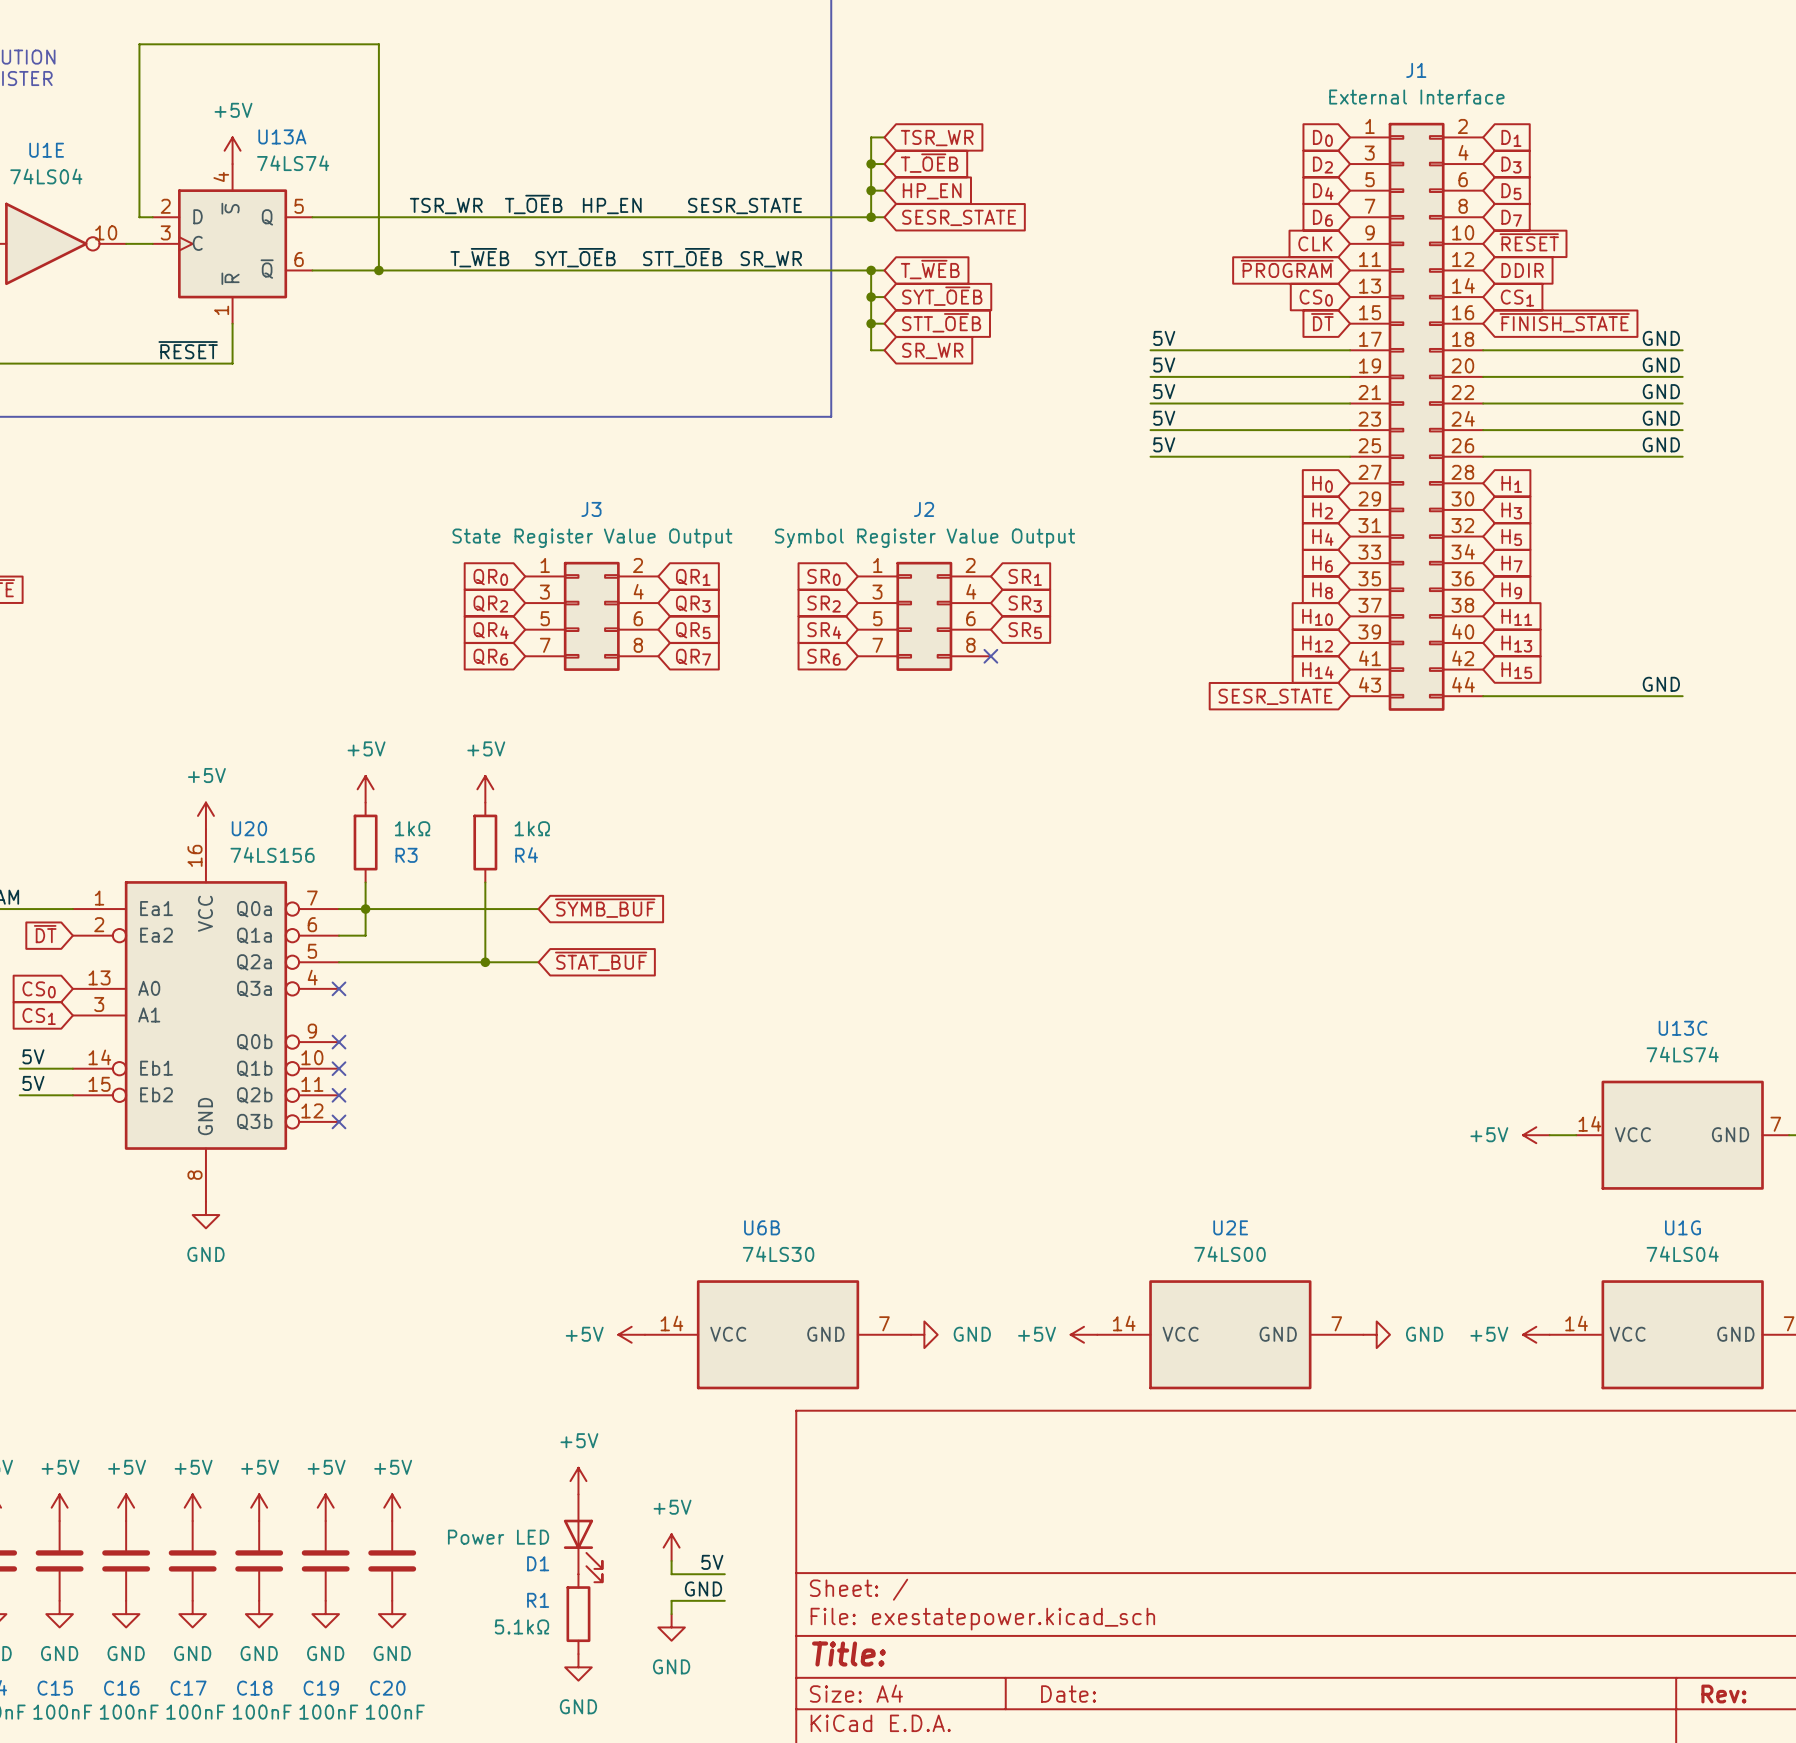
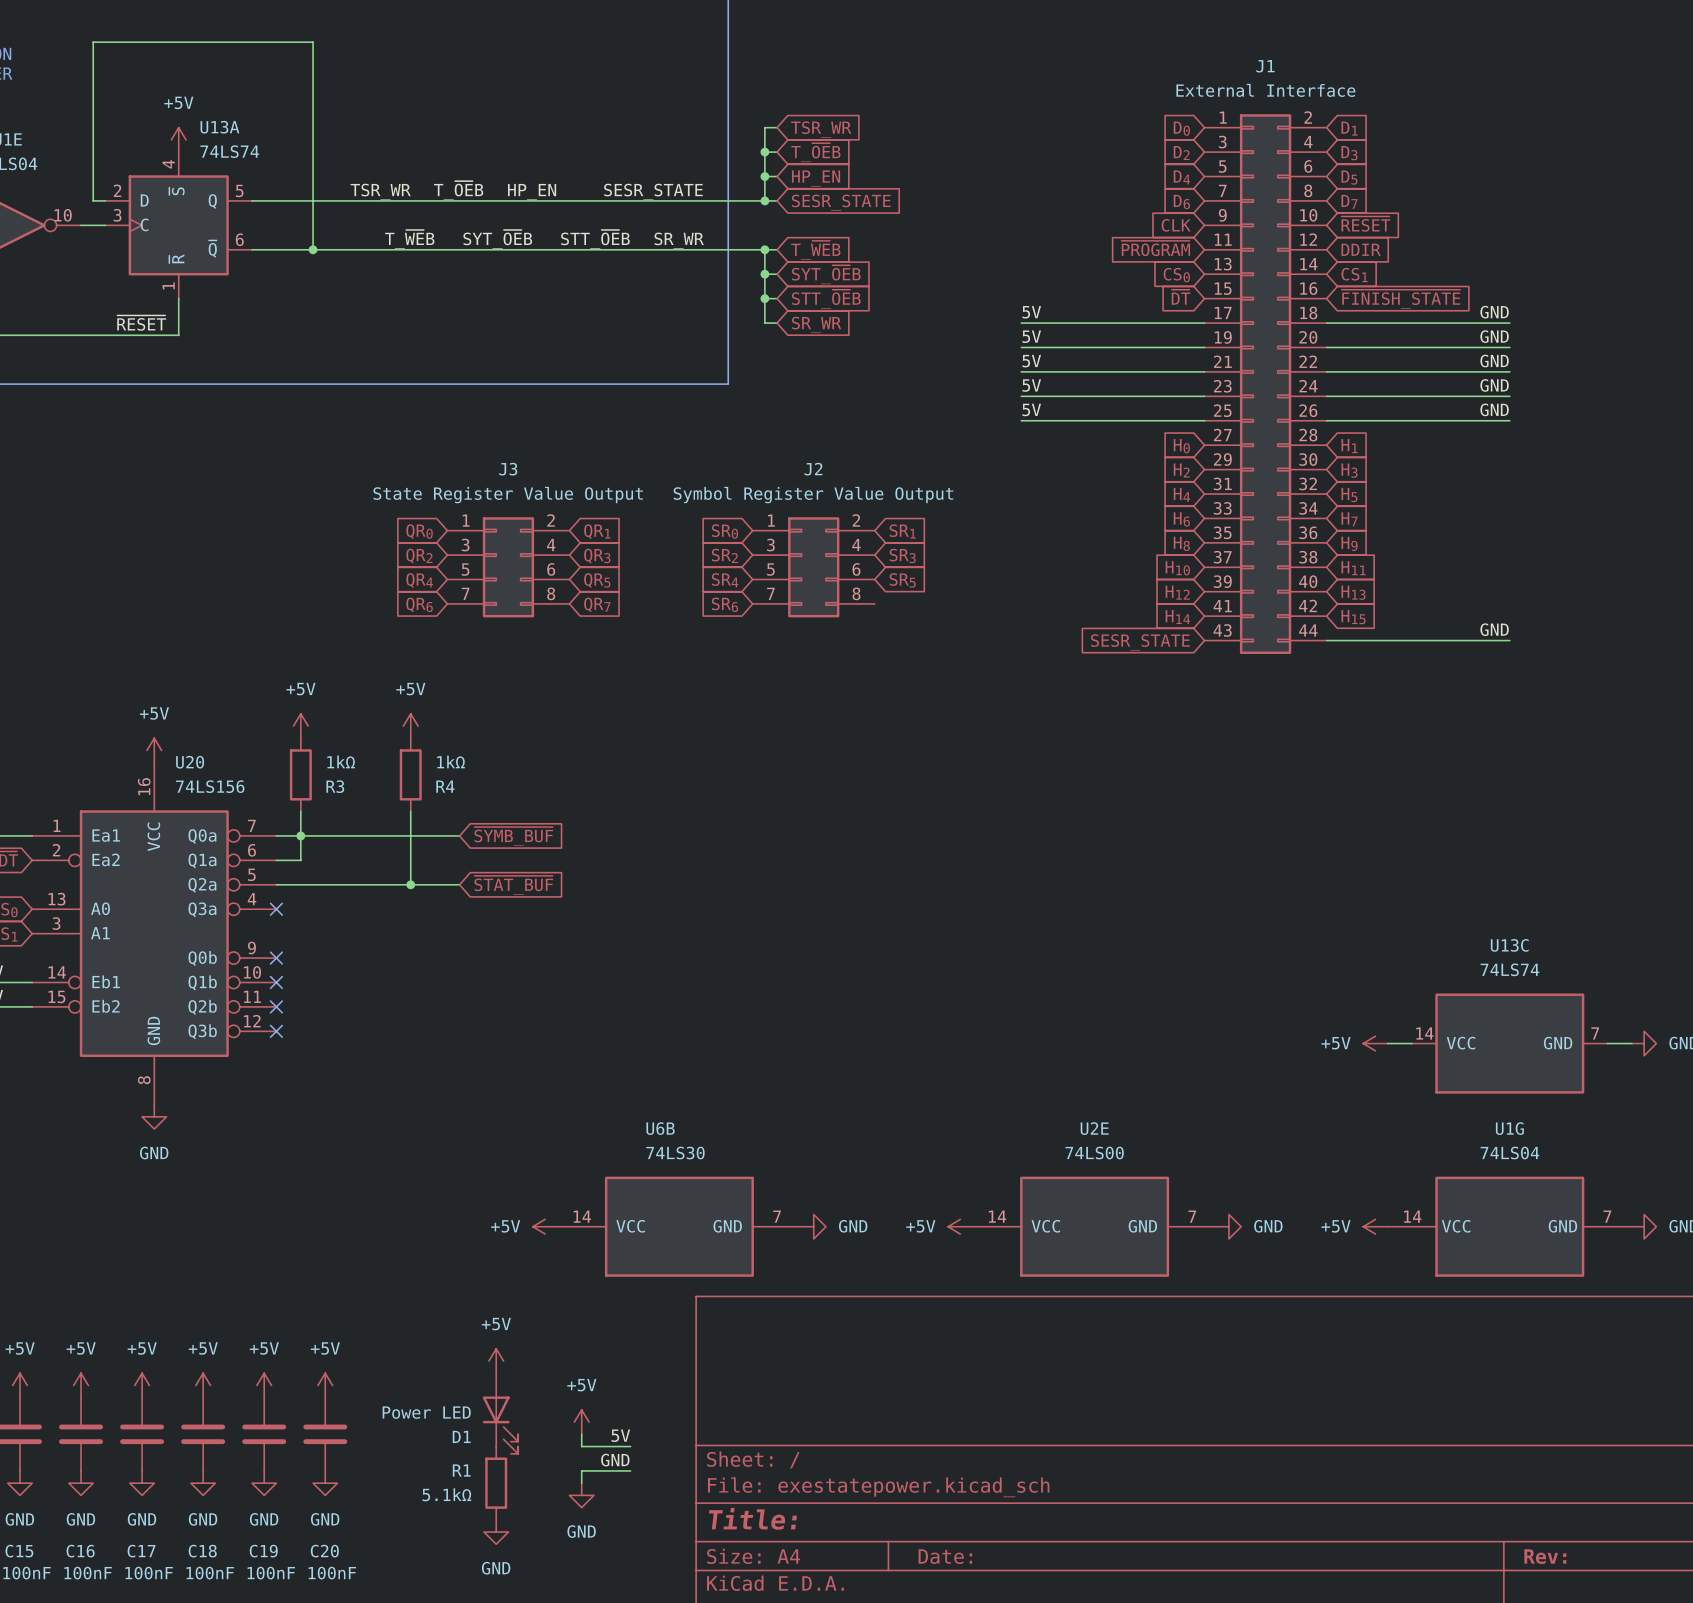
no-connect mark: (990, 656) -> none

